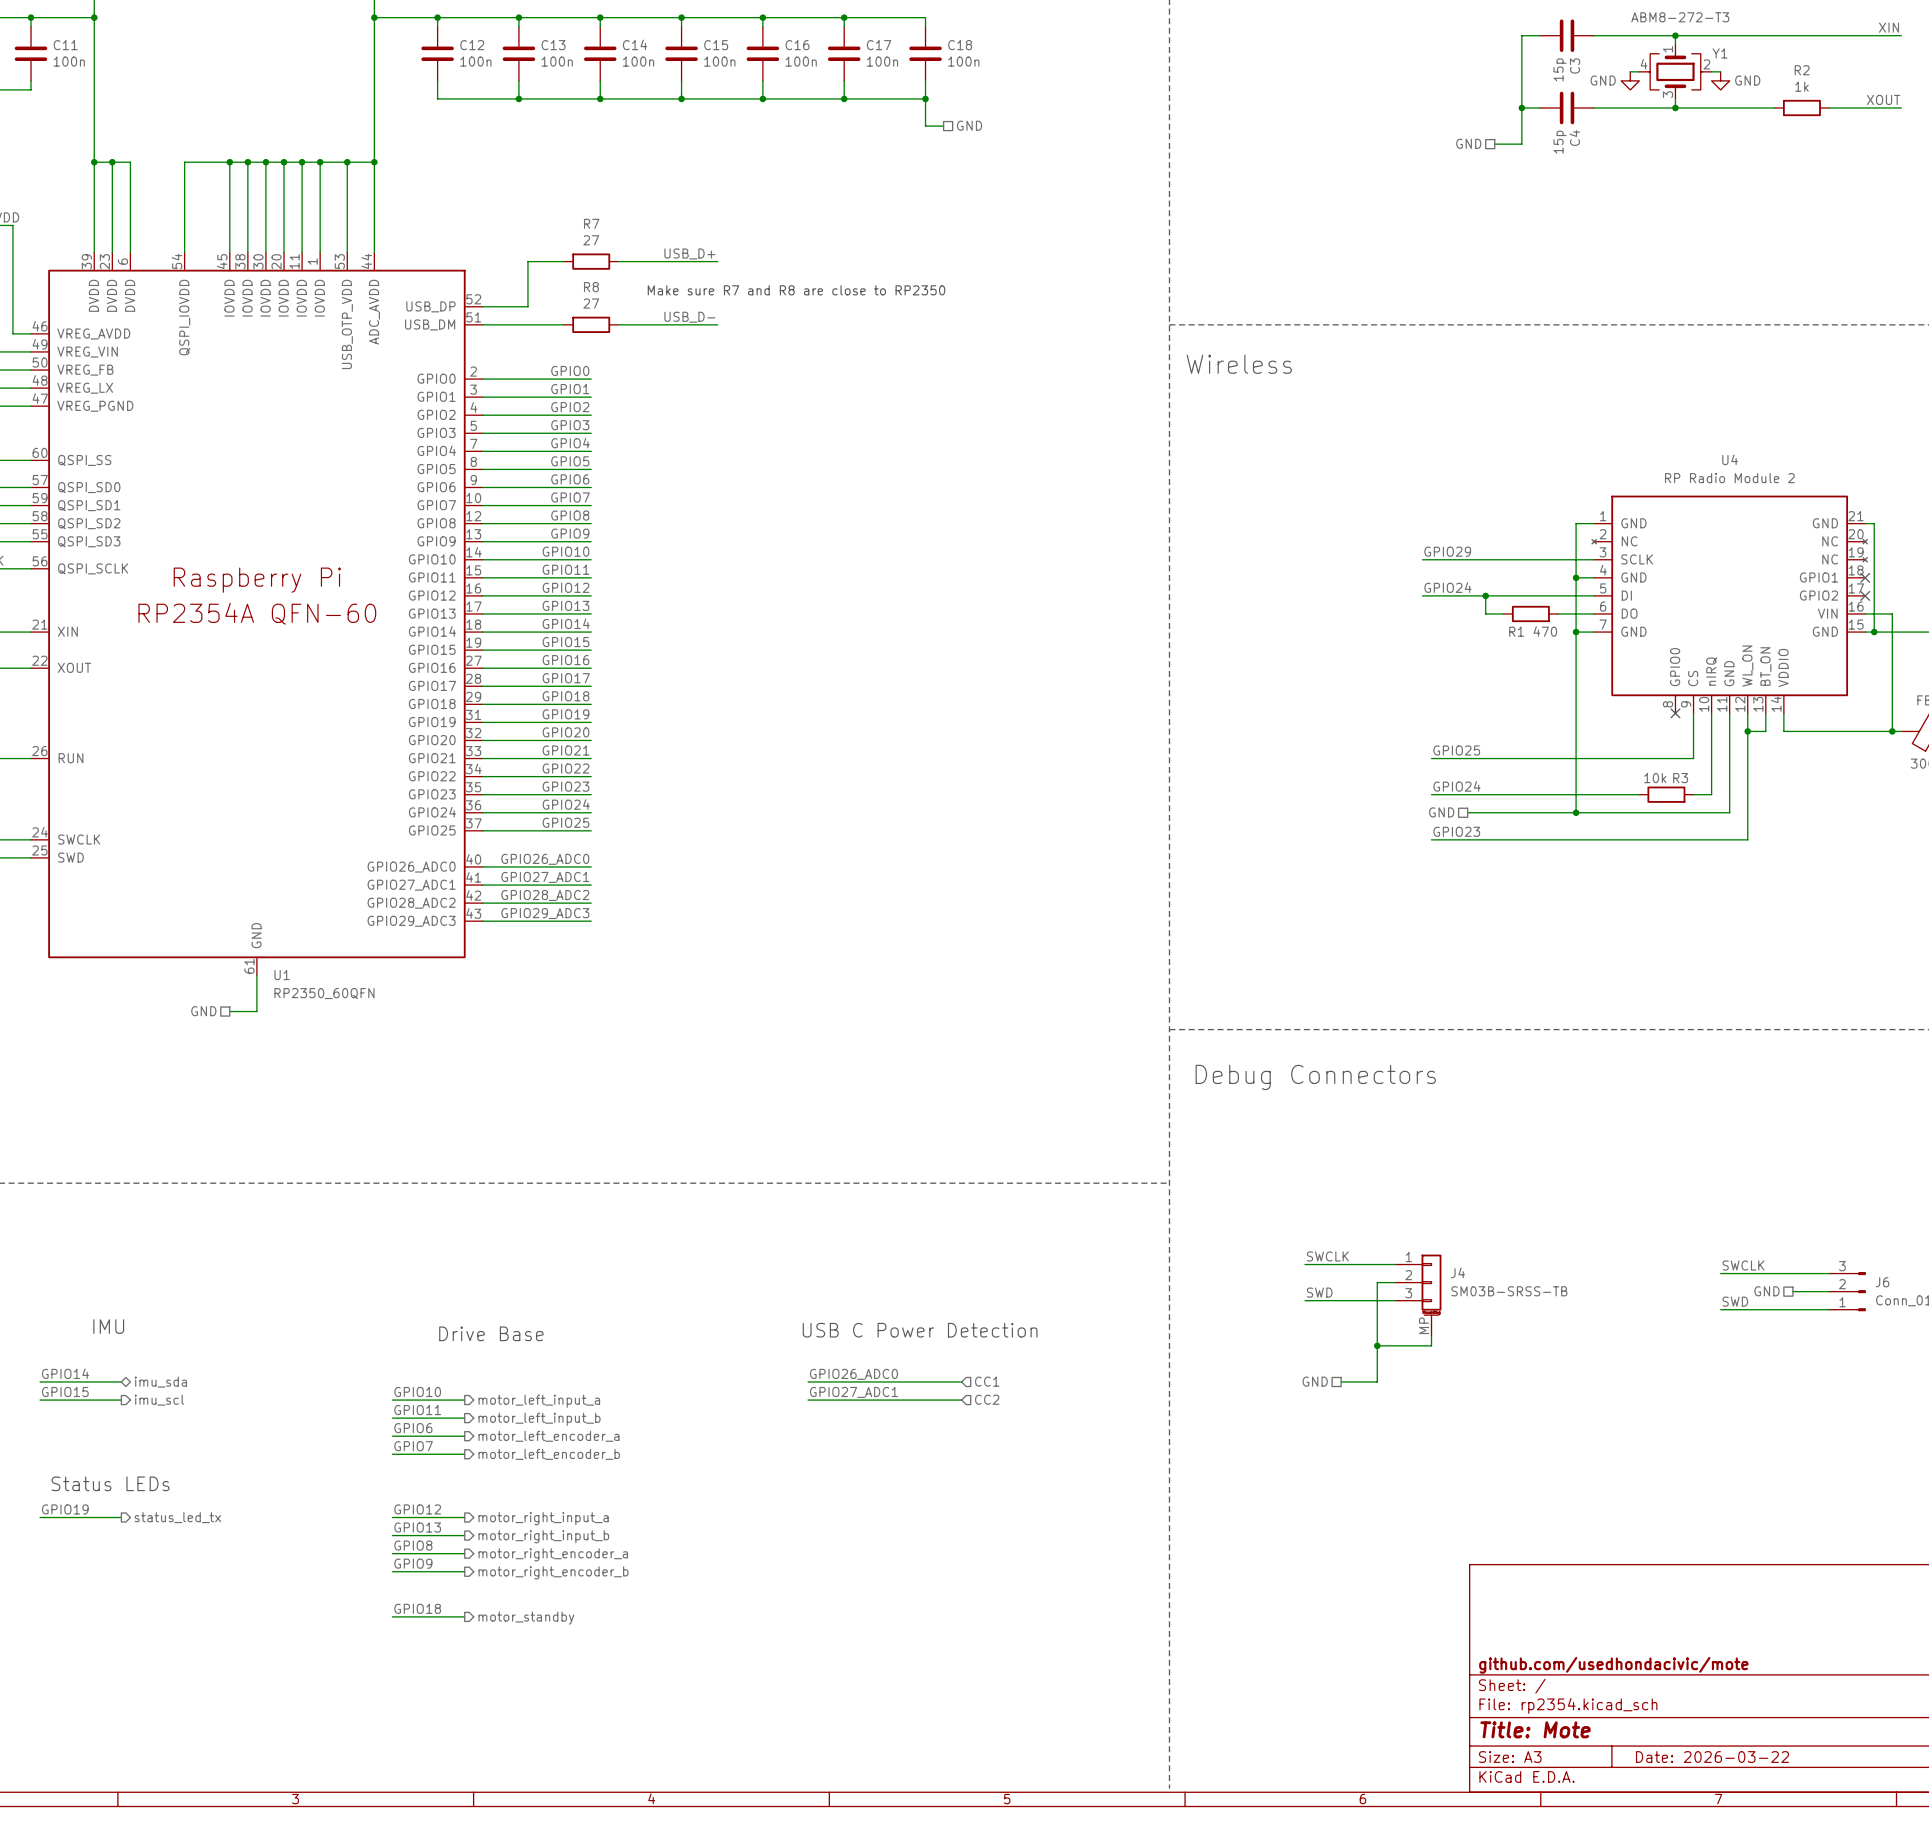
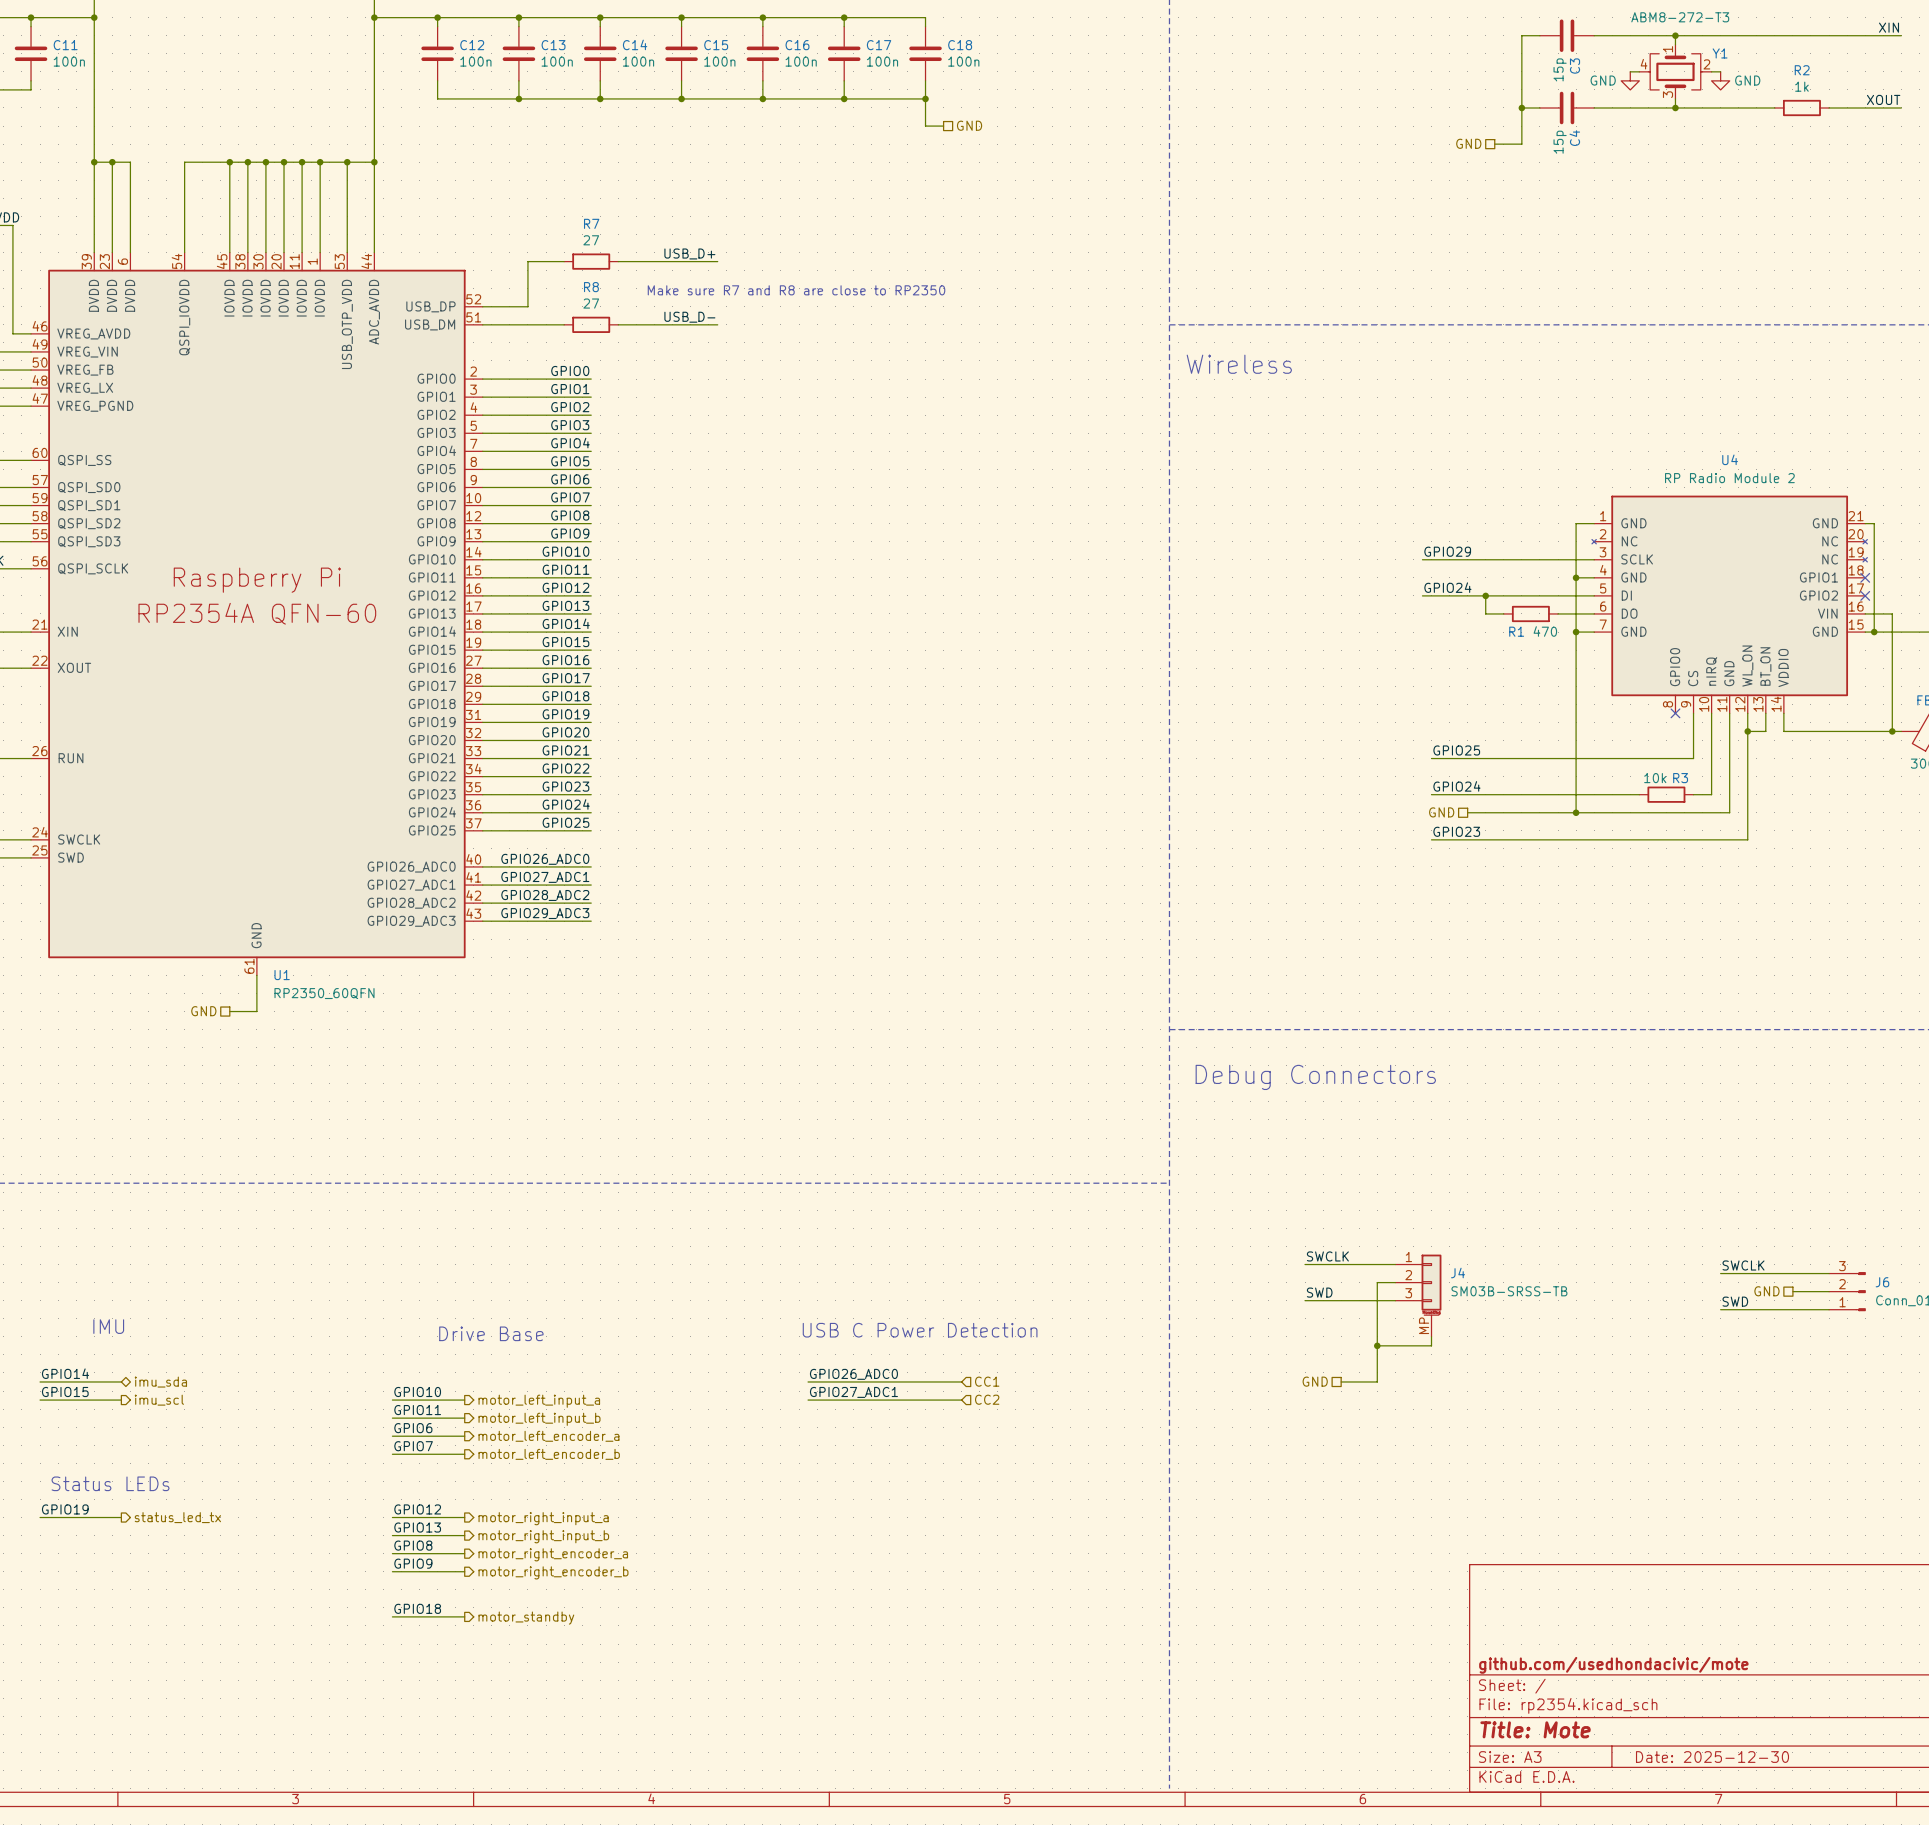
title block: Date: 2026-03-22 (1712, 1757) -> Date: 2025-12-30 (1712, 1757)

